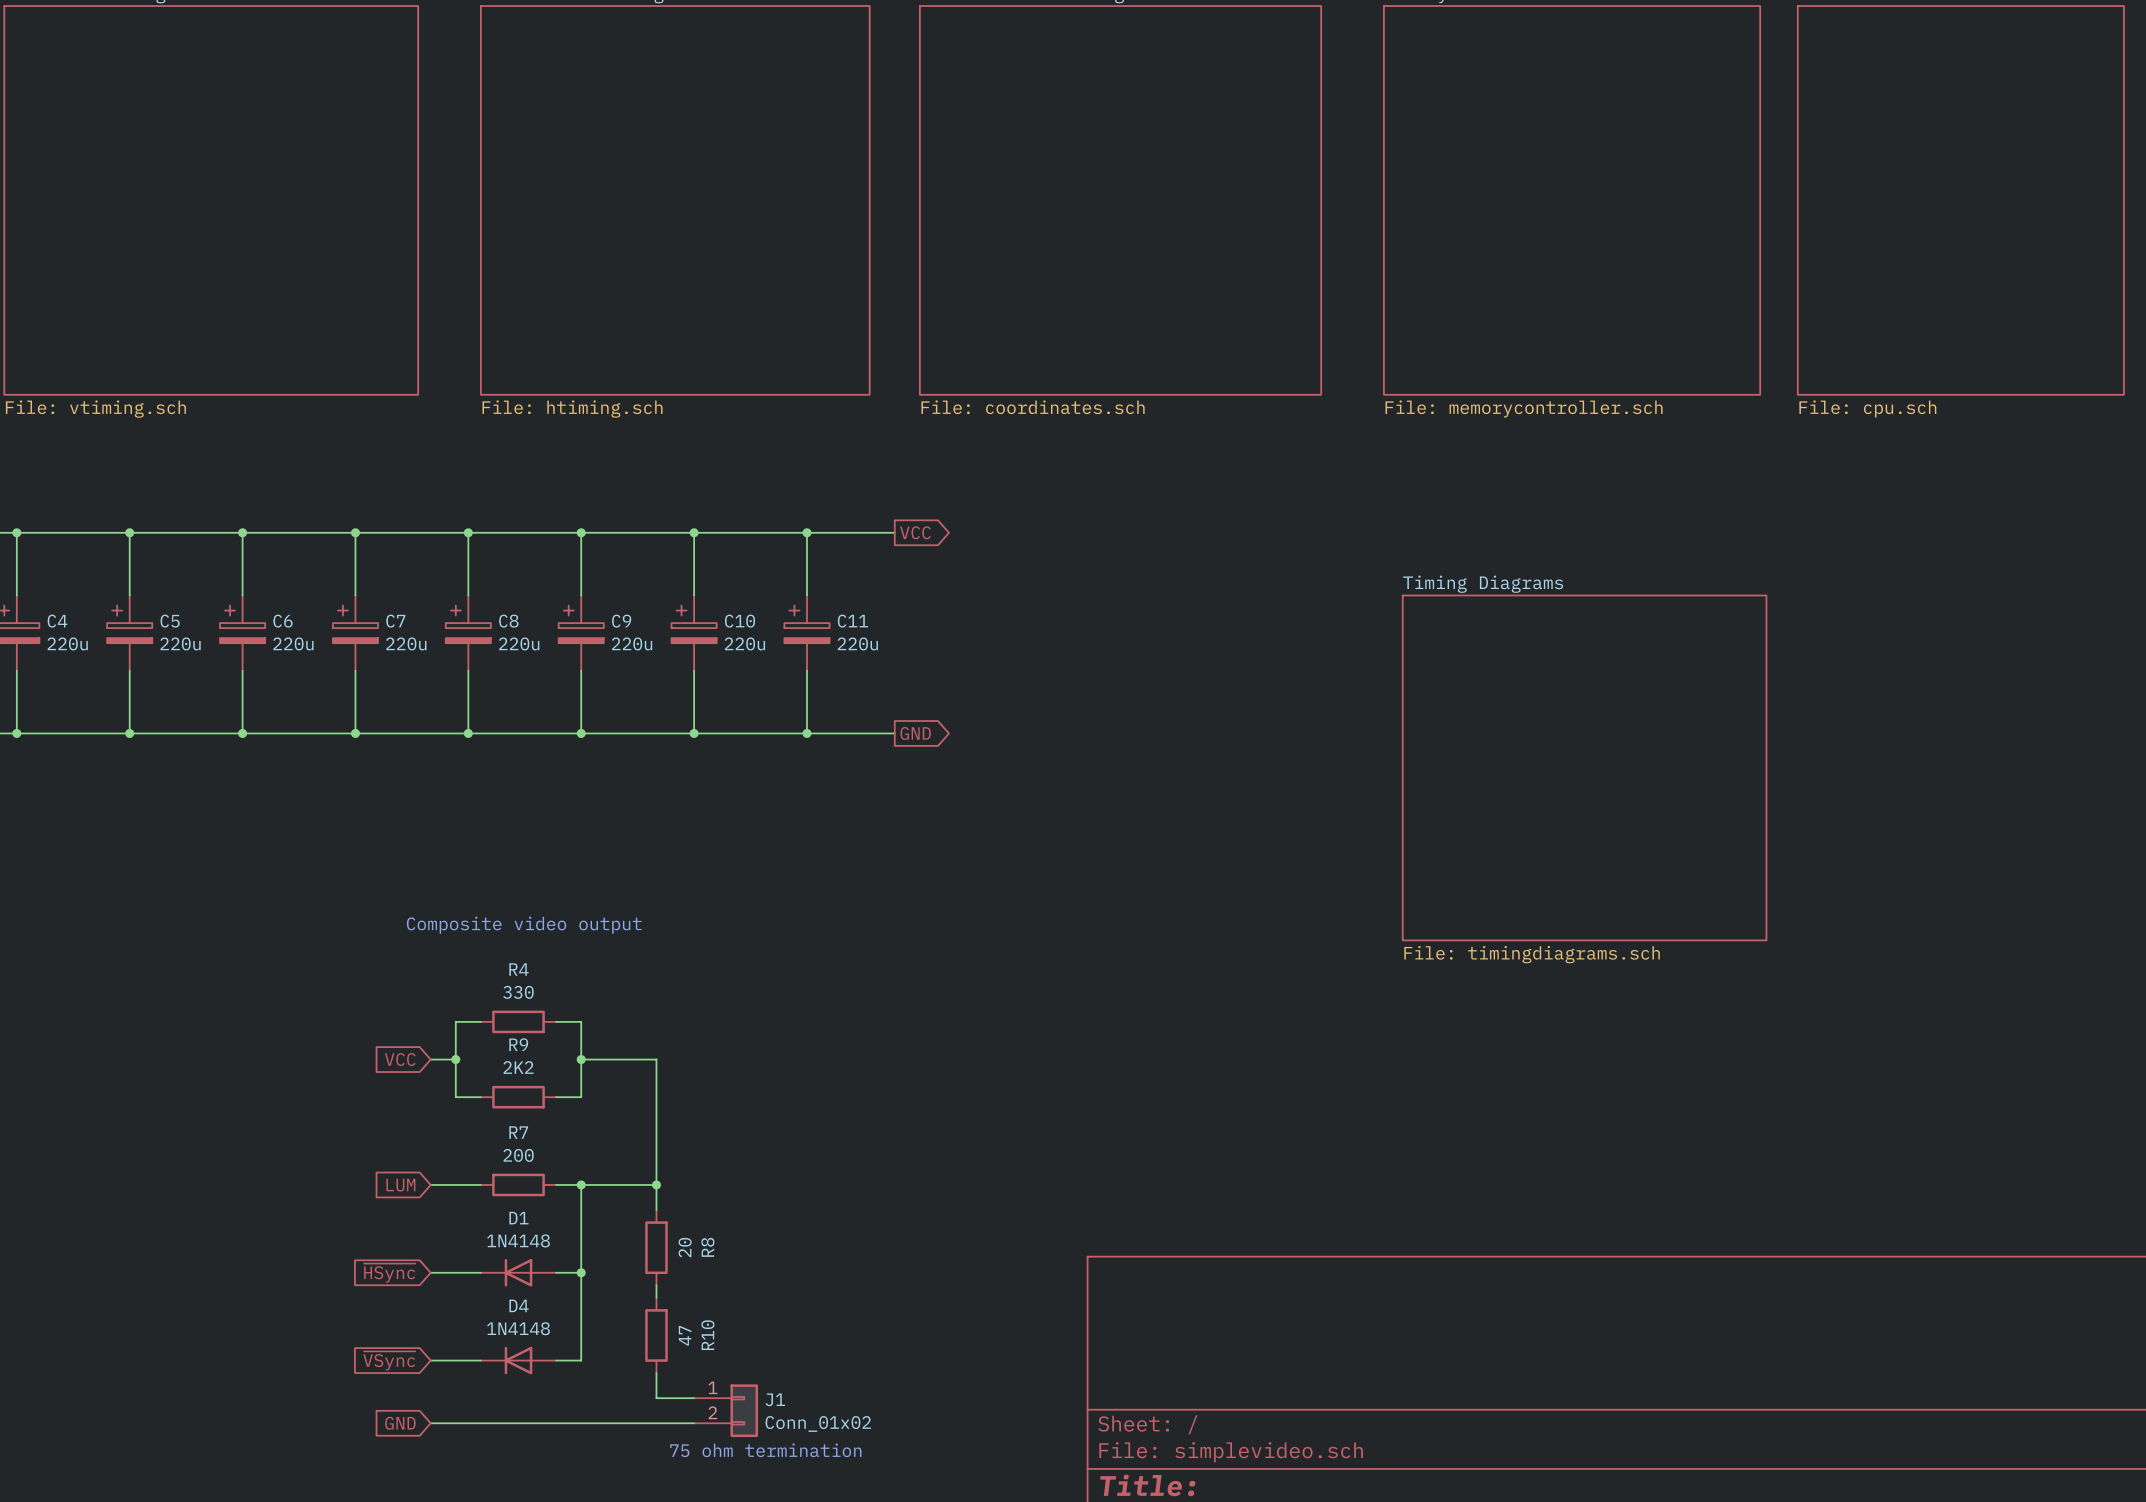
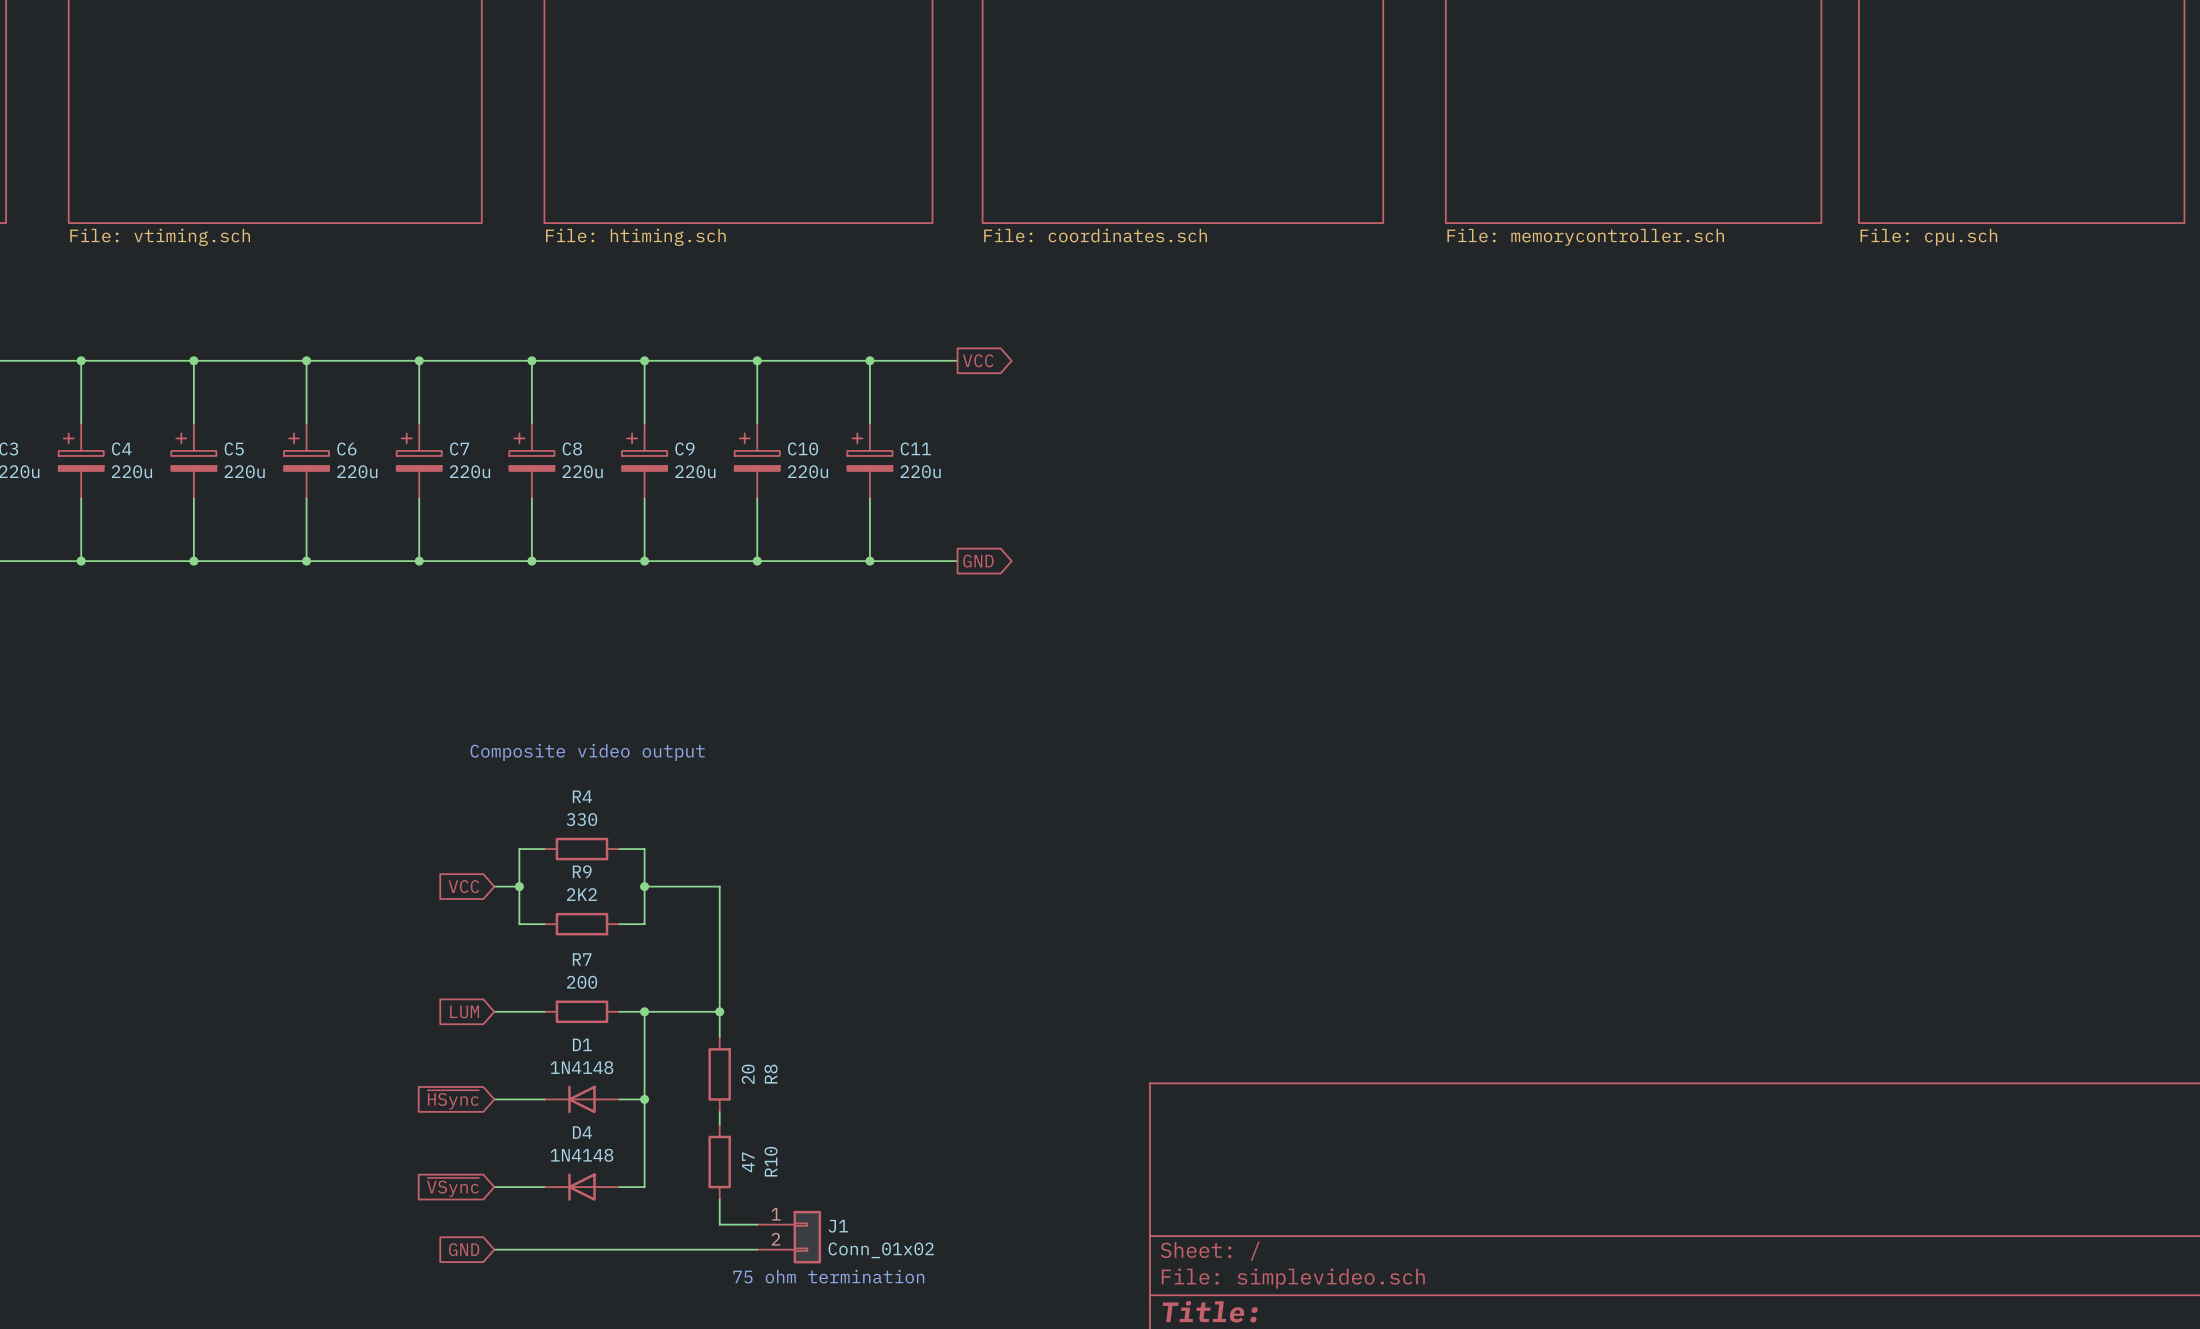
sheet Timing Diagrams: File: timingdiagrams.sch (1584, 767) -> none

